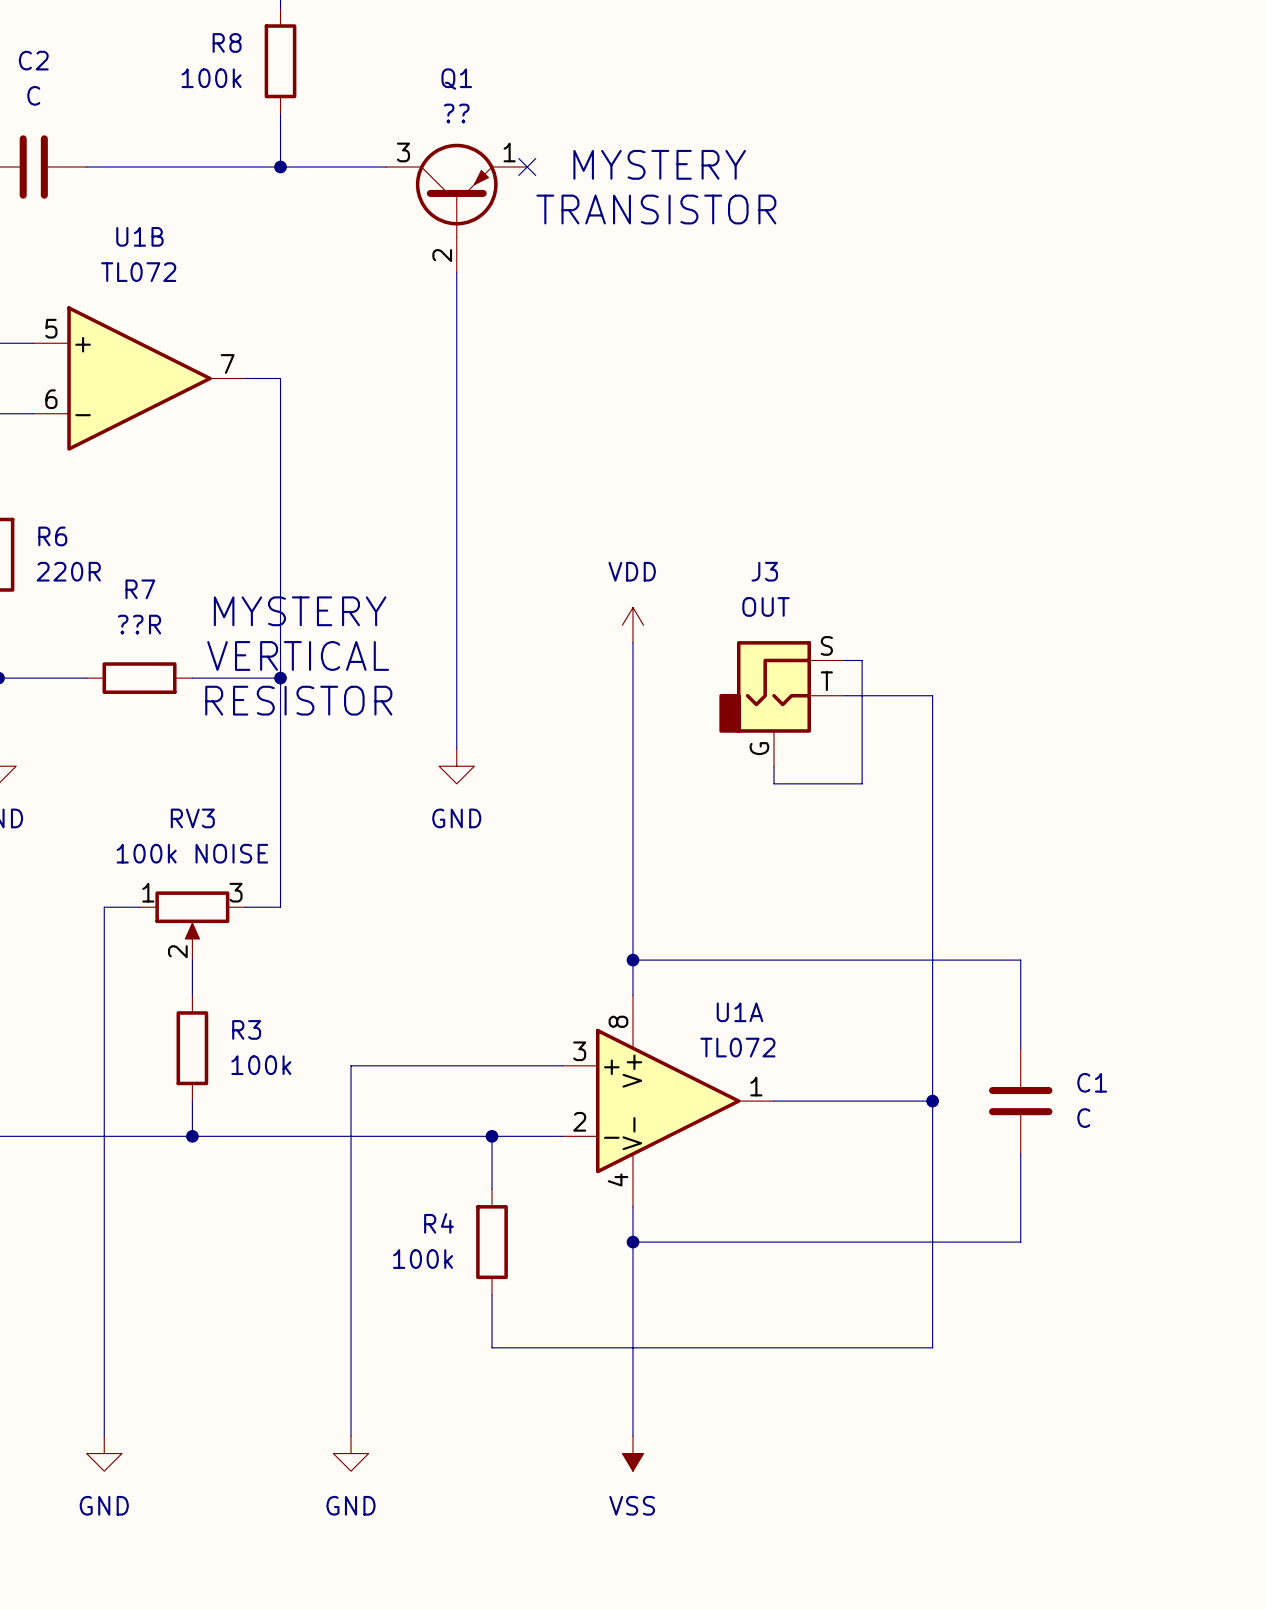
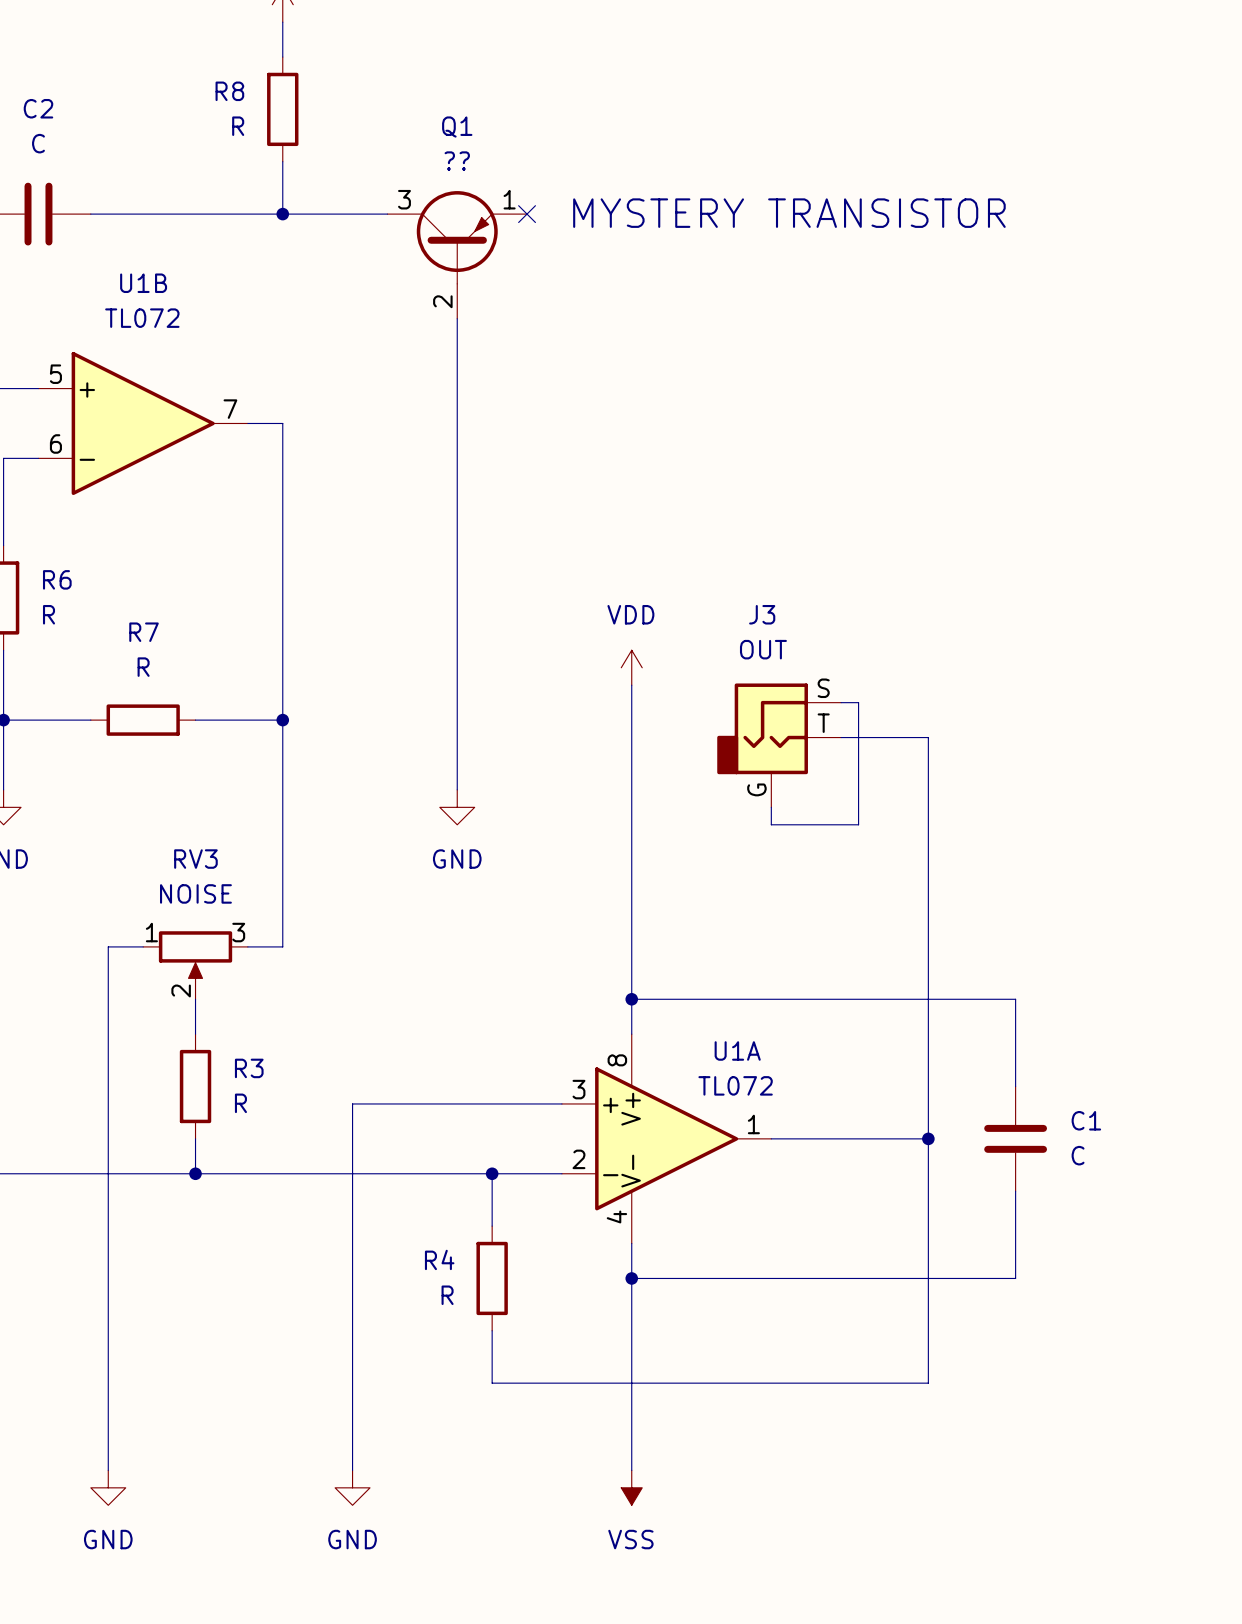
R8 value: 100k (211, 78) -> R (238, 126)
text: MYSTERY (659, 164) -> none
text: TRANSISTOR (656, 209) -> MYSTERY TRANSISTOR (789, 213)
R6 value: 220R (68, 571) -> R (49, 614)
text: MYSTERY (300, 611) -> none
R7 value: ??R (139, 624) -> R (143, 667)
text: VERTICAL (298, 655) -> none
text: RESISTOR (298, 700) -> none
RV3 value: 100k NOISE (192, 853) -> NOISE (195, 893)
R3 value: 100k (261, 1065) -> R (240, 1103)
R4 value: 100k (423, 1259) -> R (447, 1295)

